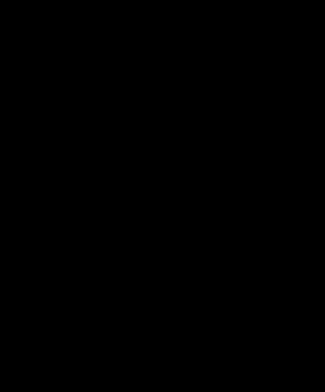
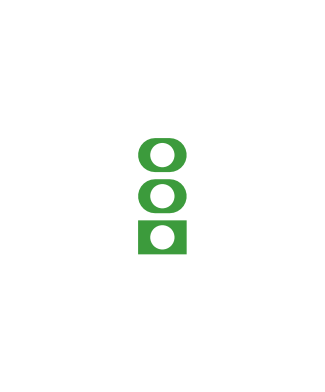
part: none -> (162, 196)

